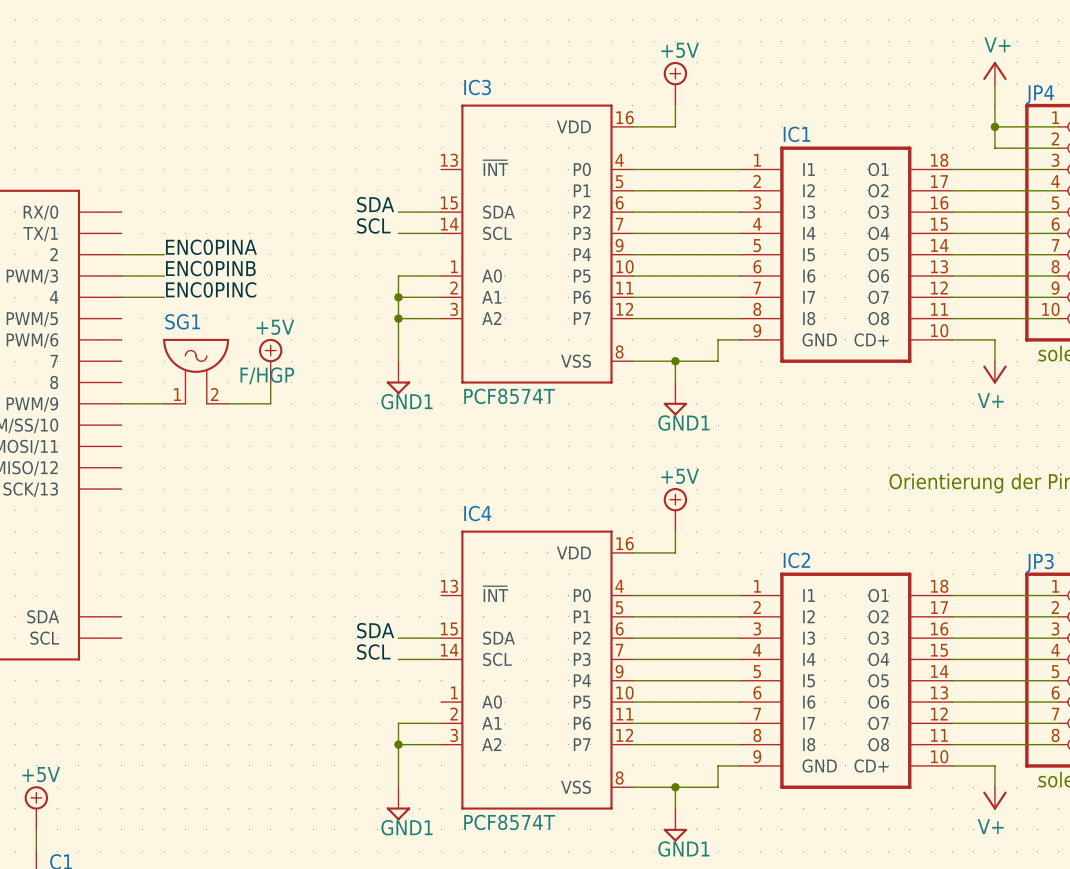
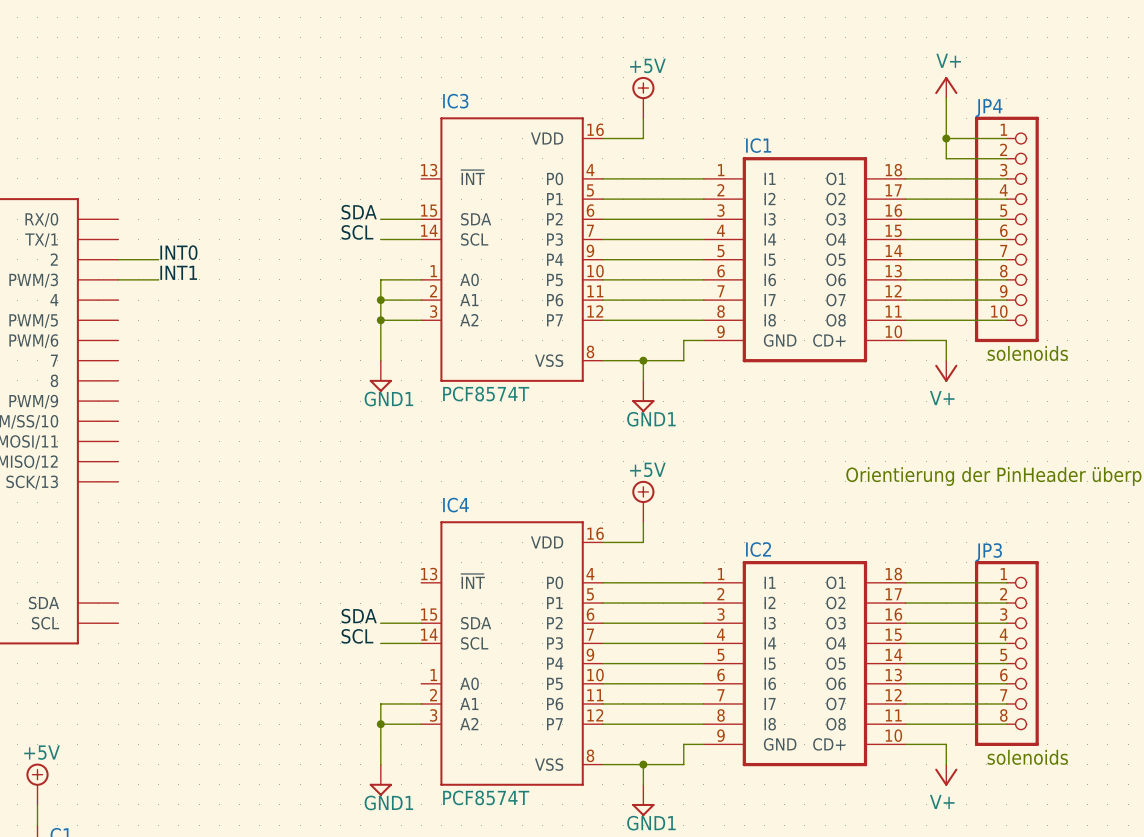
label: ENC0PINA (211, 247) -> INT0 (178, 252)
label: ENC0PINB (210, 268) -> INT1 (178, 272)
label: ENC0PINC (211, 289) -> none
wire: (121, 297) (164, 297) -> none
power symbol: +5V (270, 360) -> none
SG1: F/HGP (196, 371) -> none
wire: (270, 382) (270, 403) (228, 403) -> none
wire: (121, 403) (164, 403) -> none

